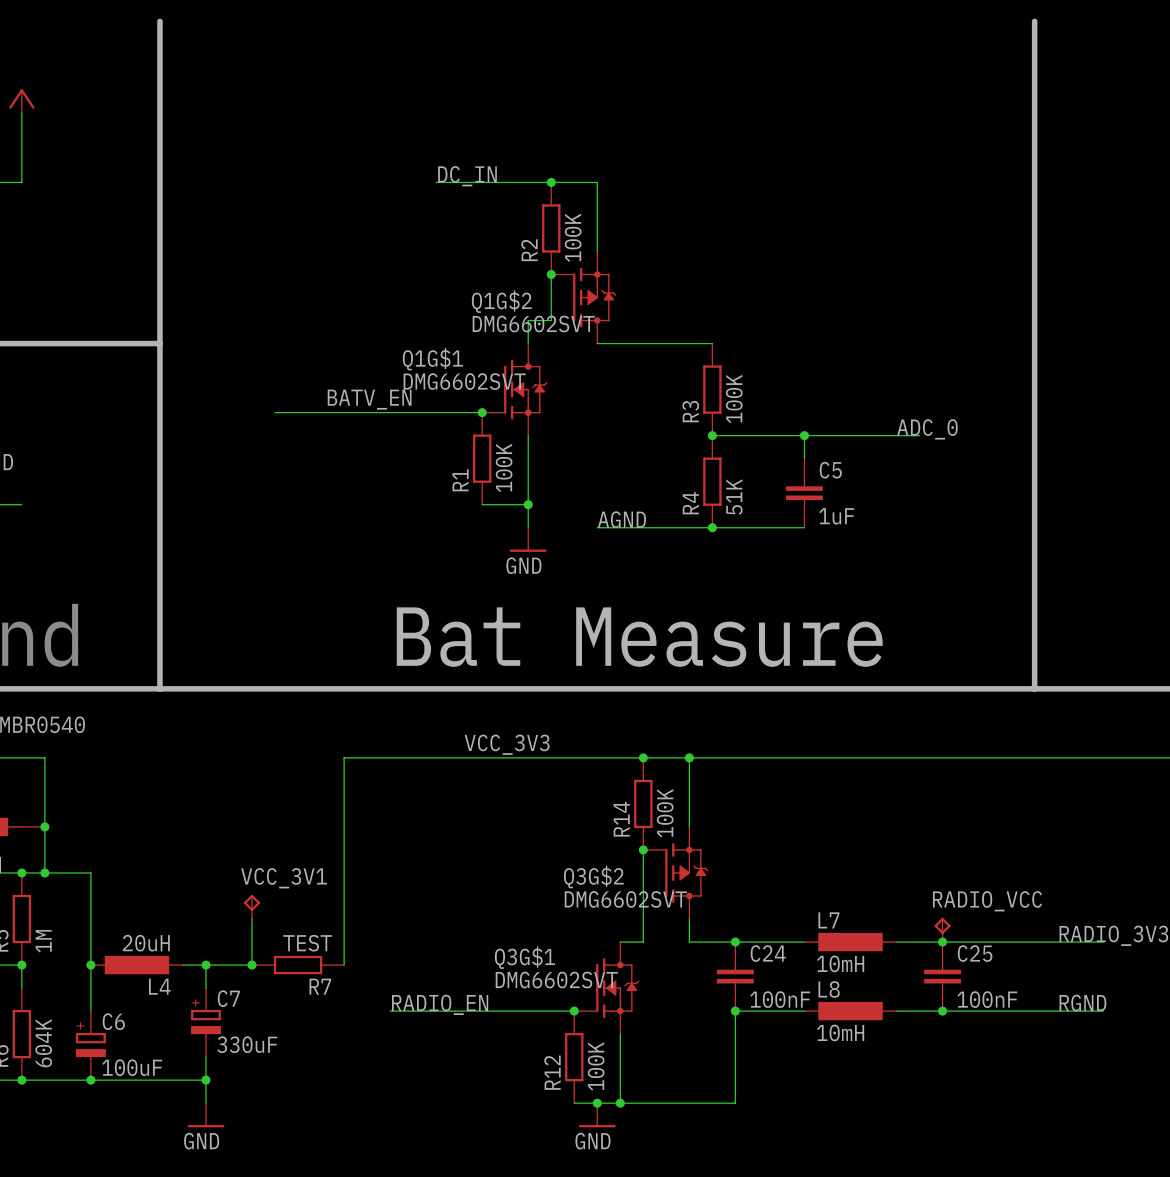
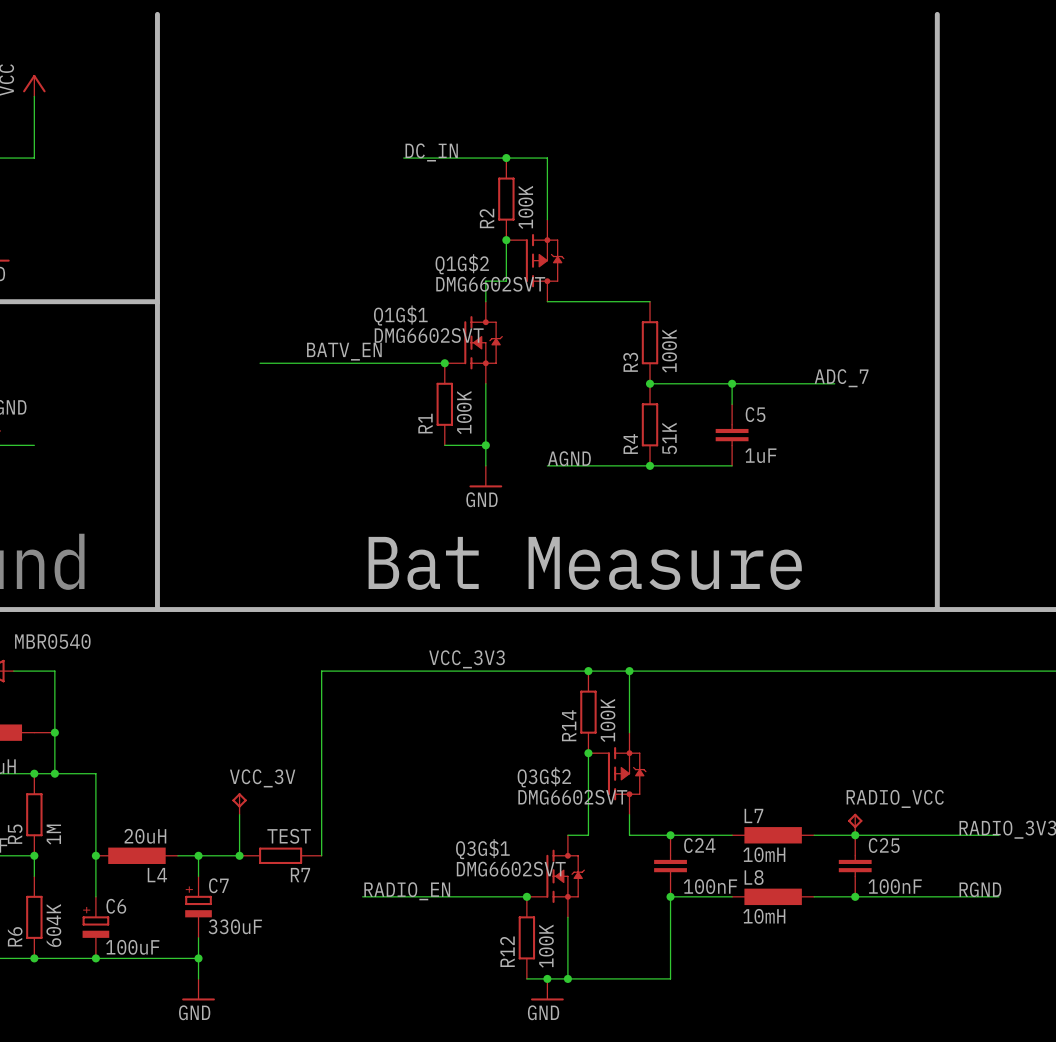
label: ADC_0 (927, 429) -> ADC_7 (841, 378)
VCC_3V1 name: VCC_3V1 (284, 878) -> VCC_3V (262, 778)

